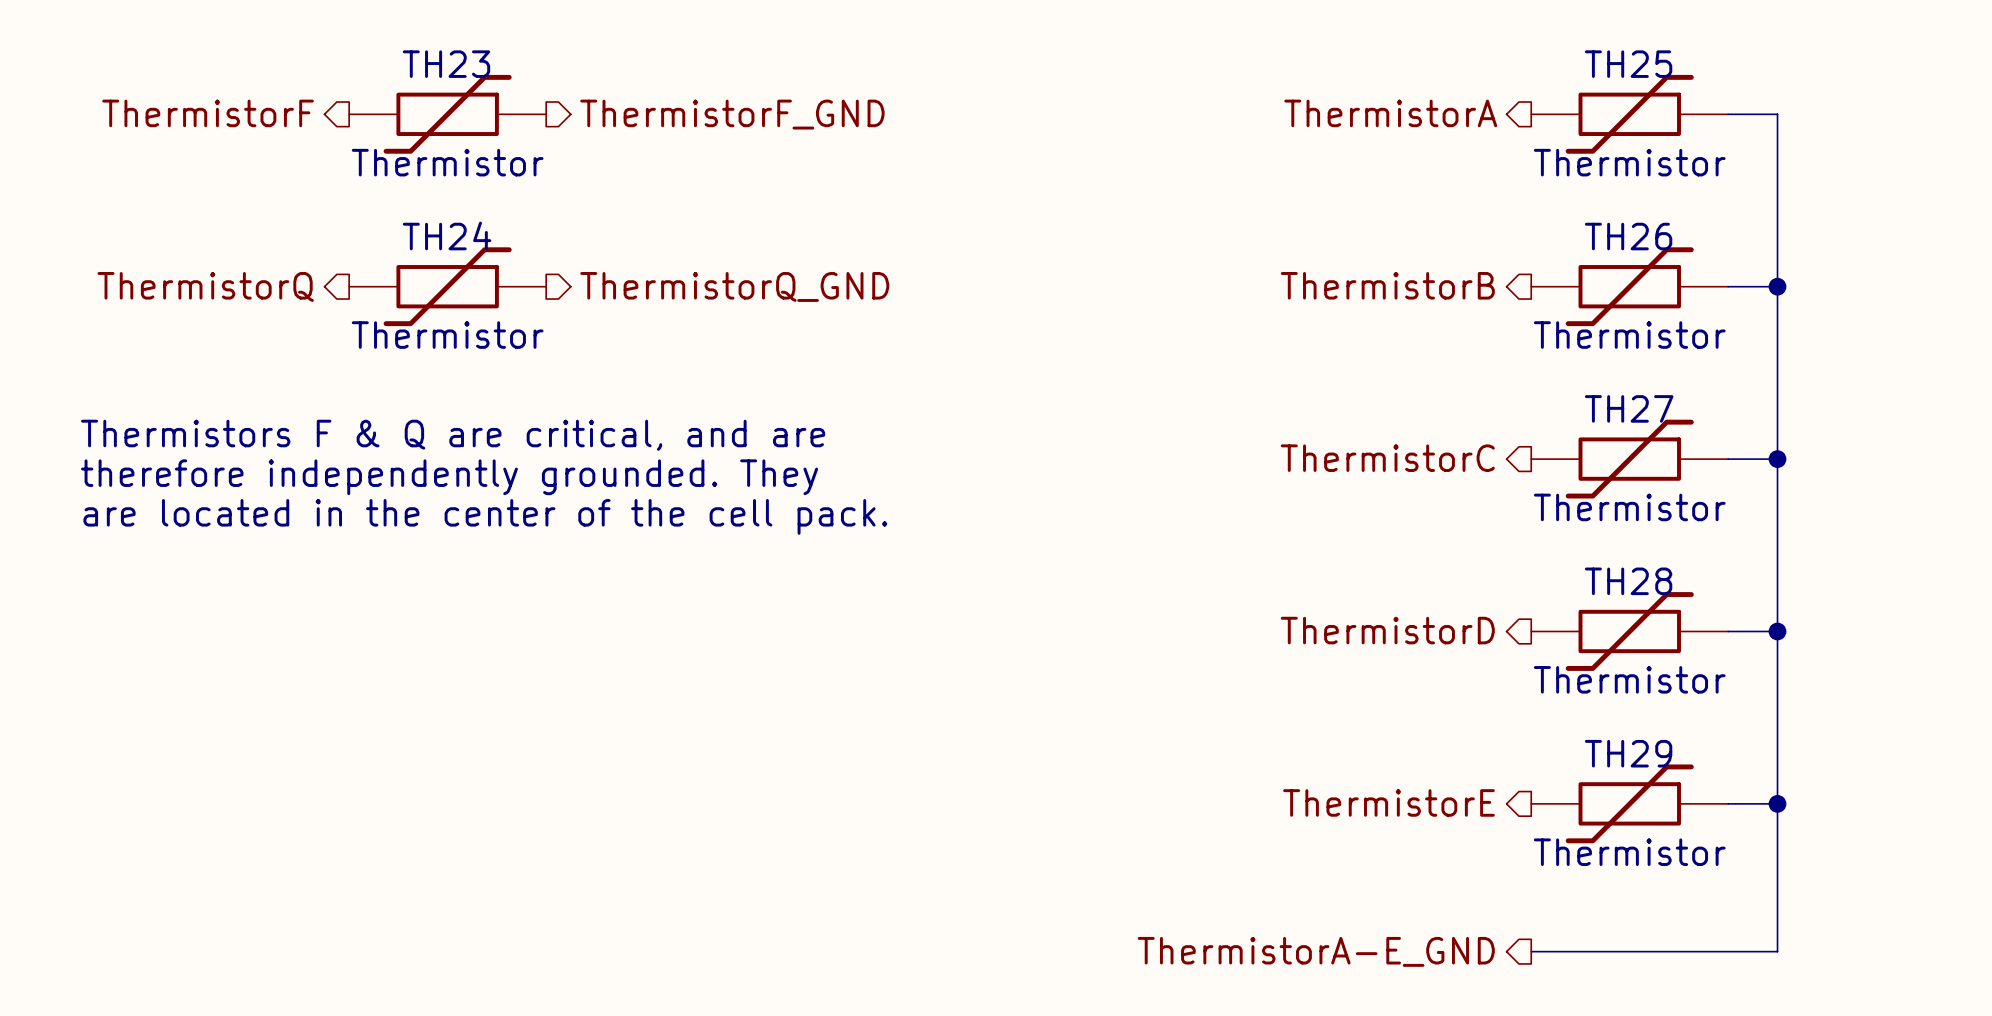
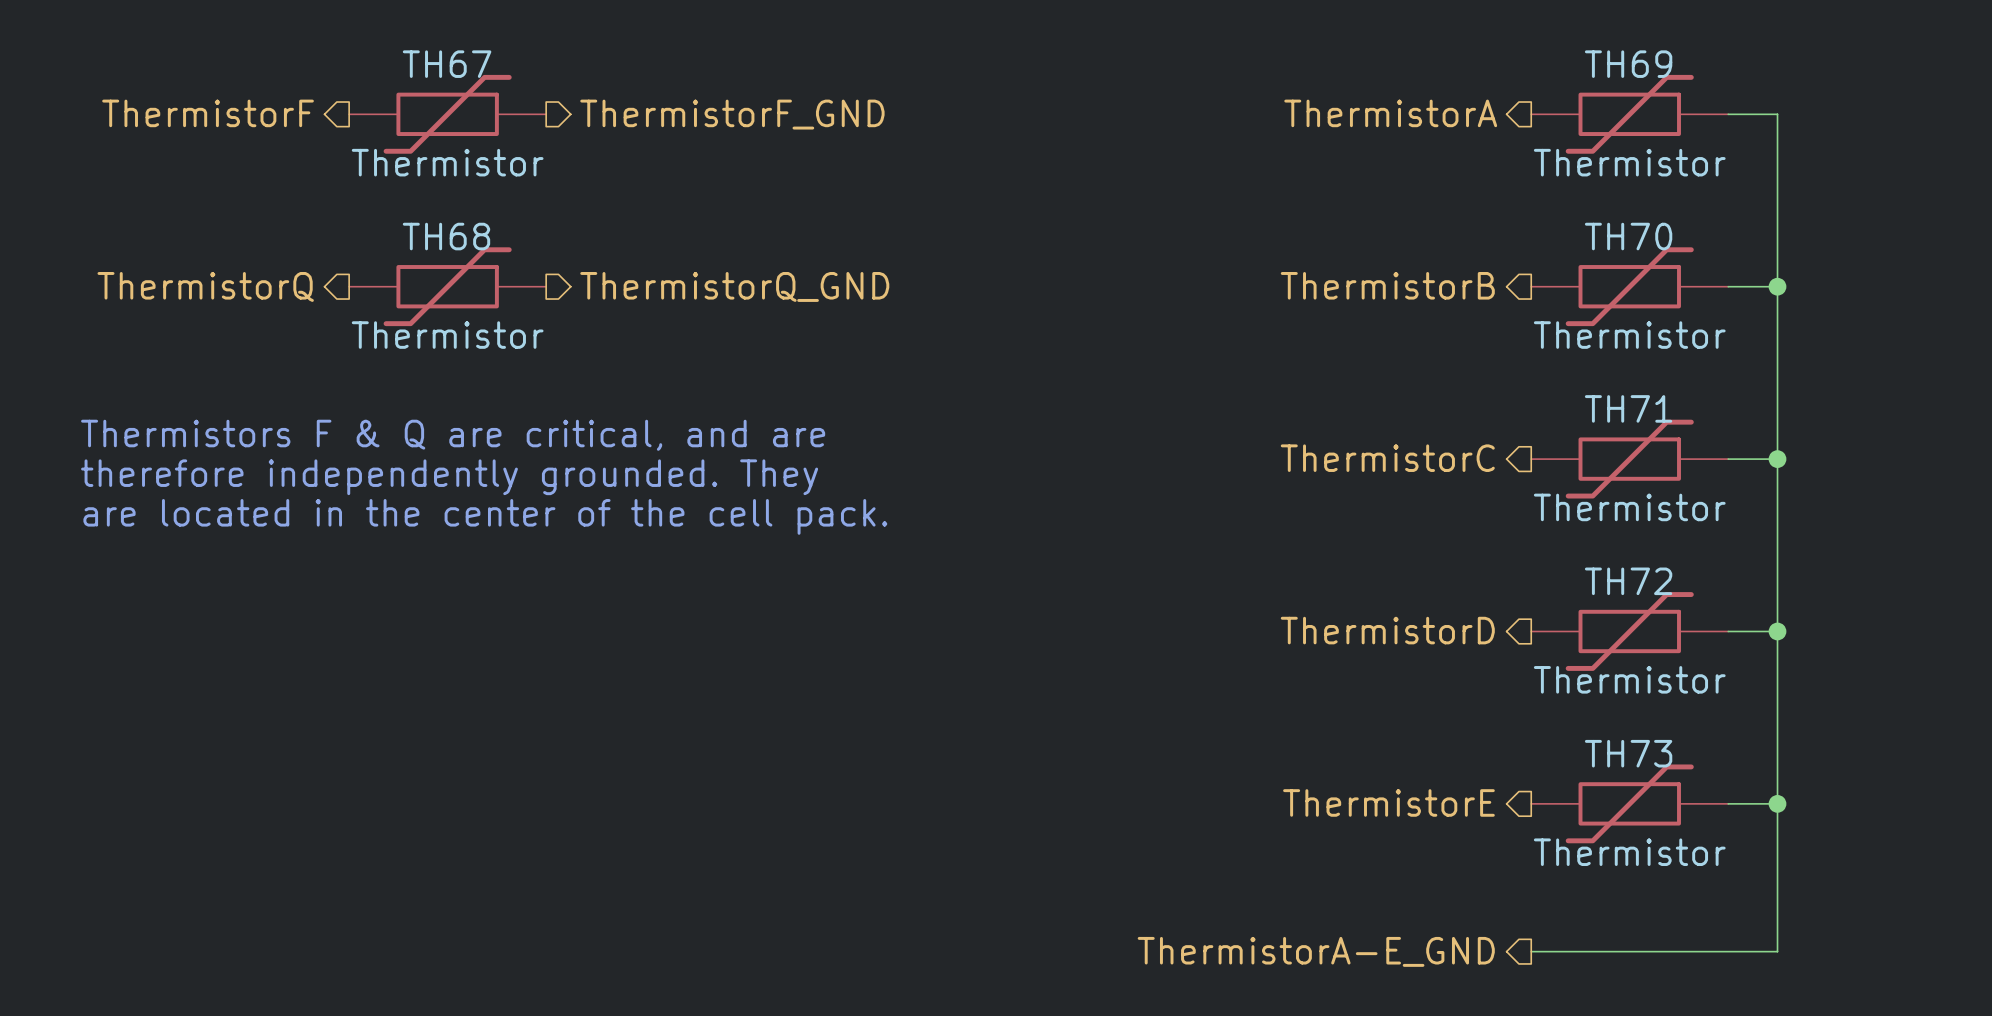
TH23 name: TH23 (446, 64) -> TH67 (447, 64)
TH25 name: TH25 (1628, 64) -> TH69 (1628, 64)
TH24 name: TH24 (447, 235) -> TH68 (446, 236)
TH26 name: TH26 (1628, 236) -> TH70 (1628, 236)
TH27 name: TH27 (1629, 408) -> TH71 (1628, 408)
TH28 name: TH28 (1628, 581) -> TH72 (1628, 581)
TH29 name: TH29 (1628, 753) -> TH73 (1628, 753)

